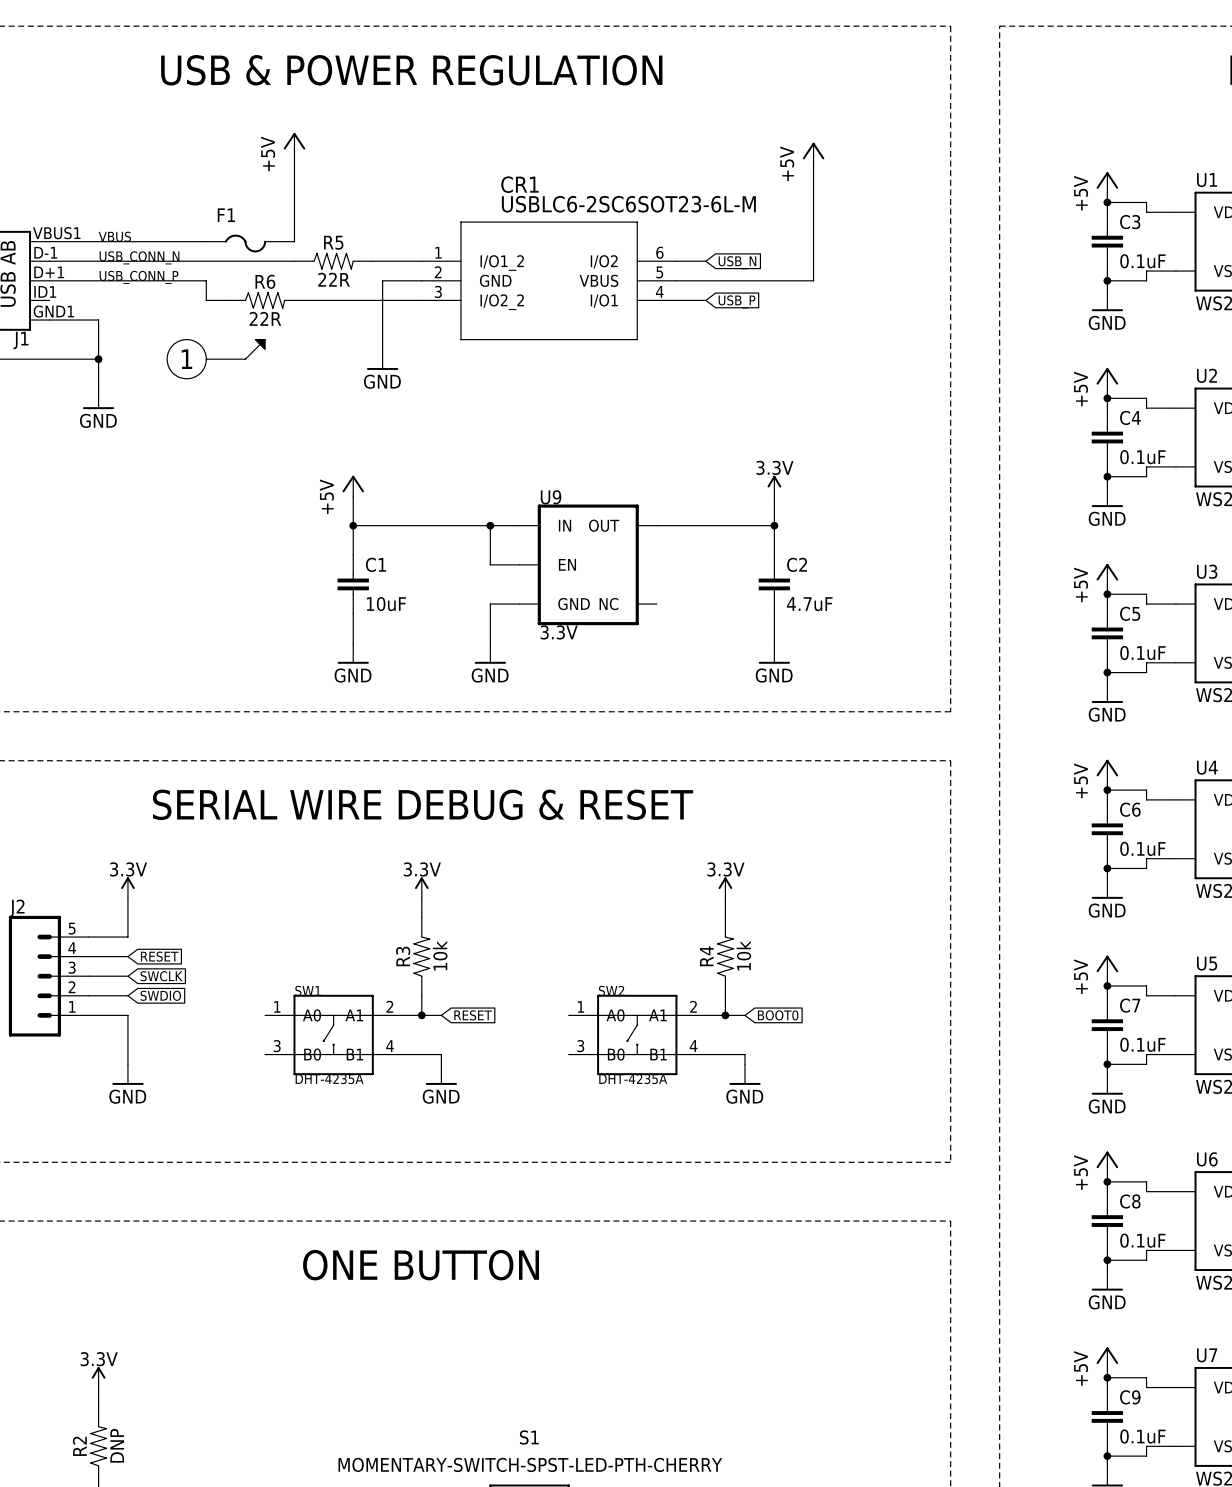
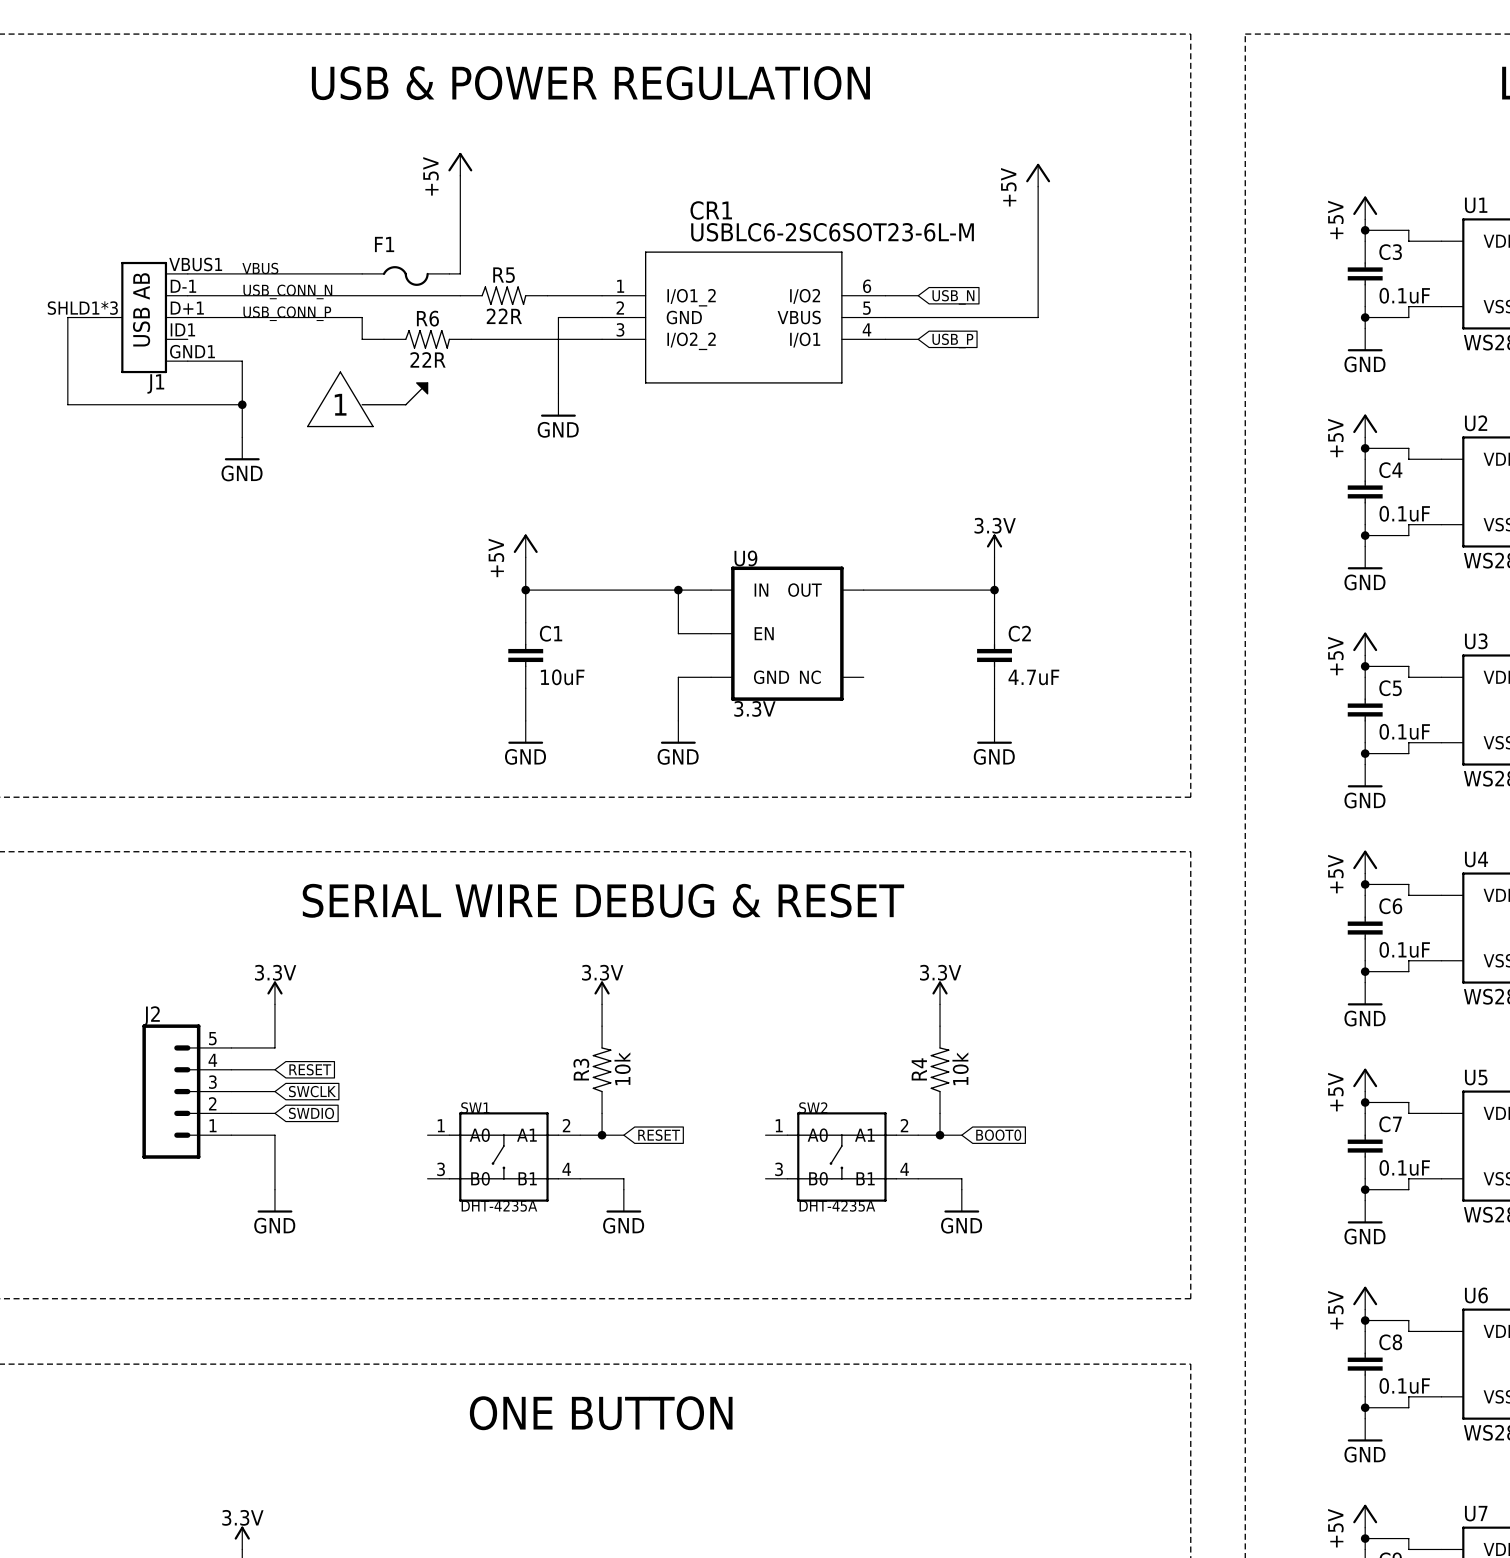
line: none -> (340, 372) (307, 426) (373, 426) (340, 372)
drawing: [166, 339, 207, 380] -> none

